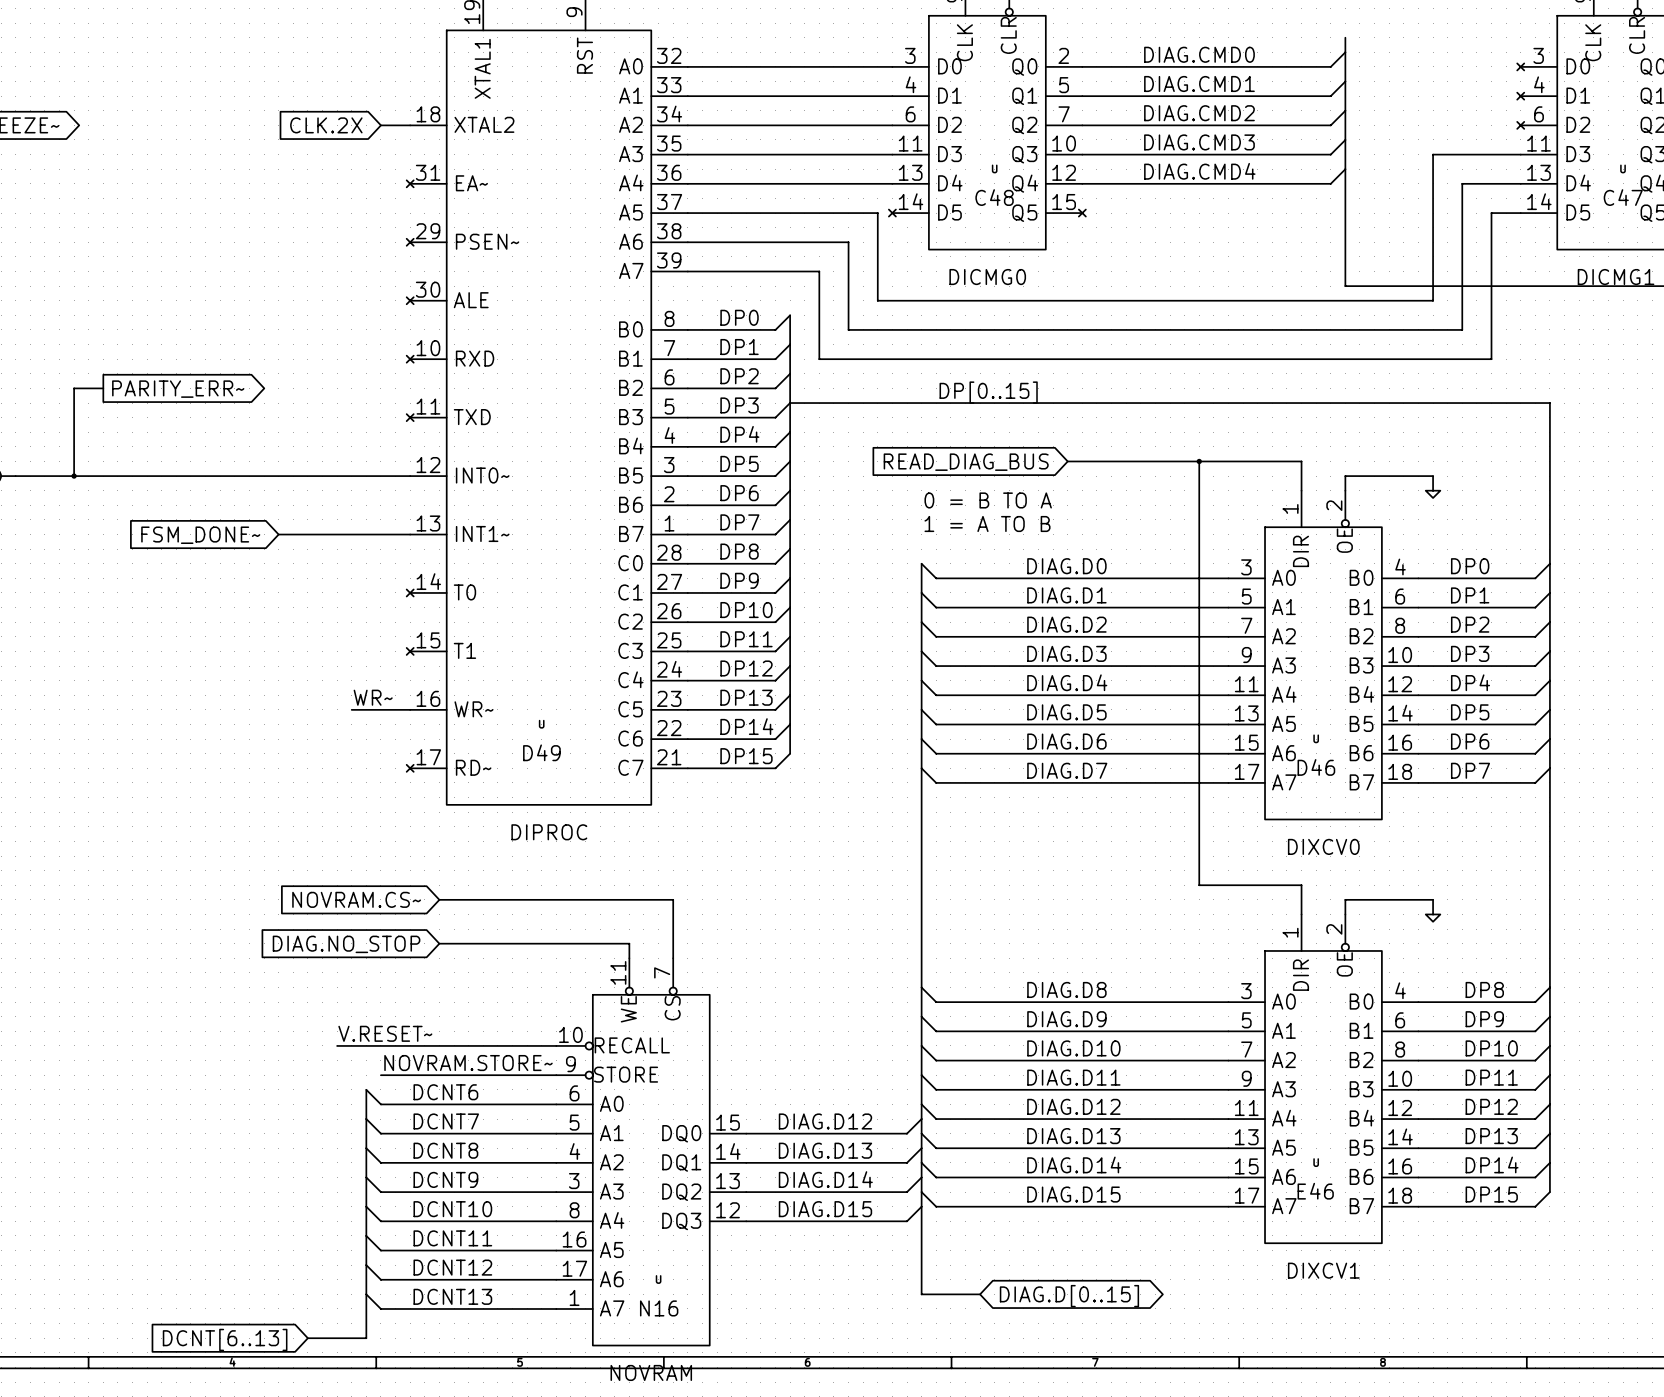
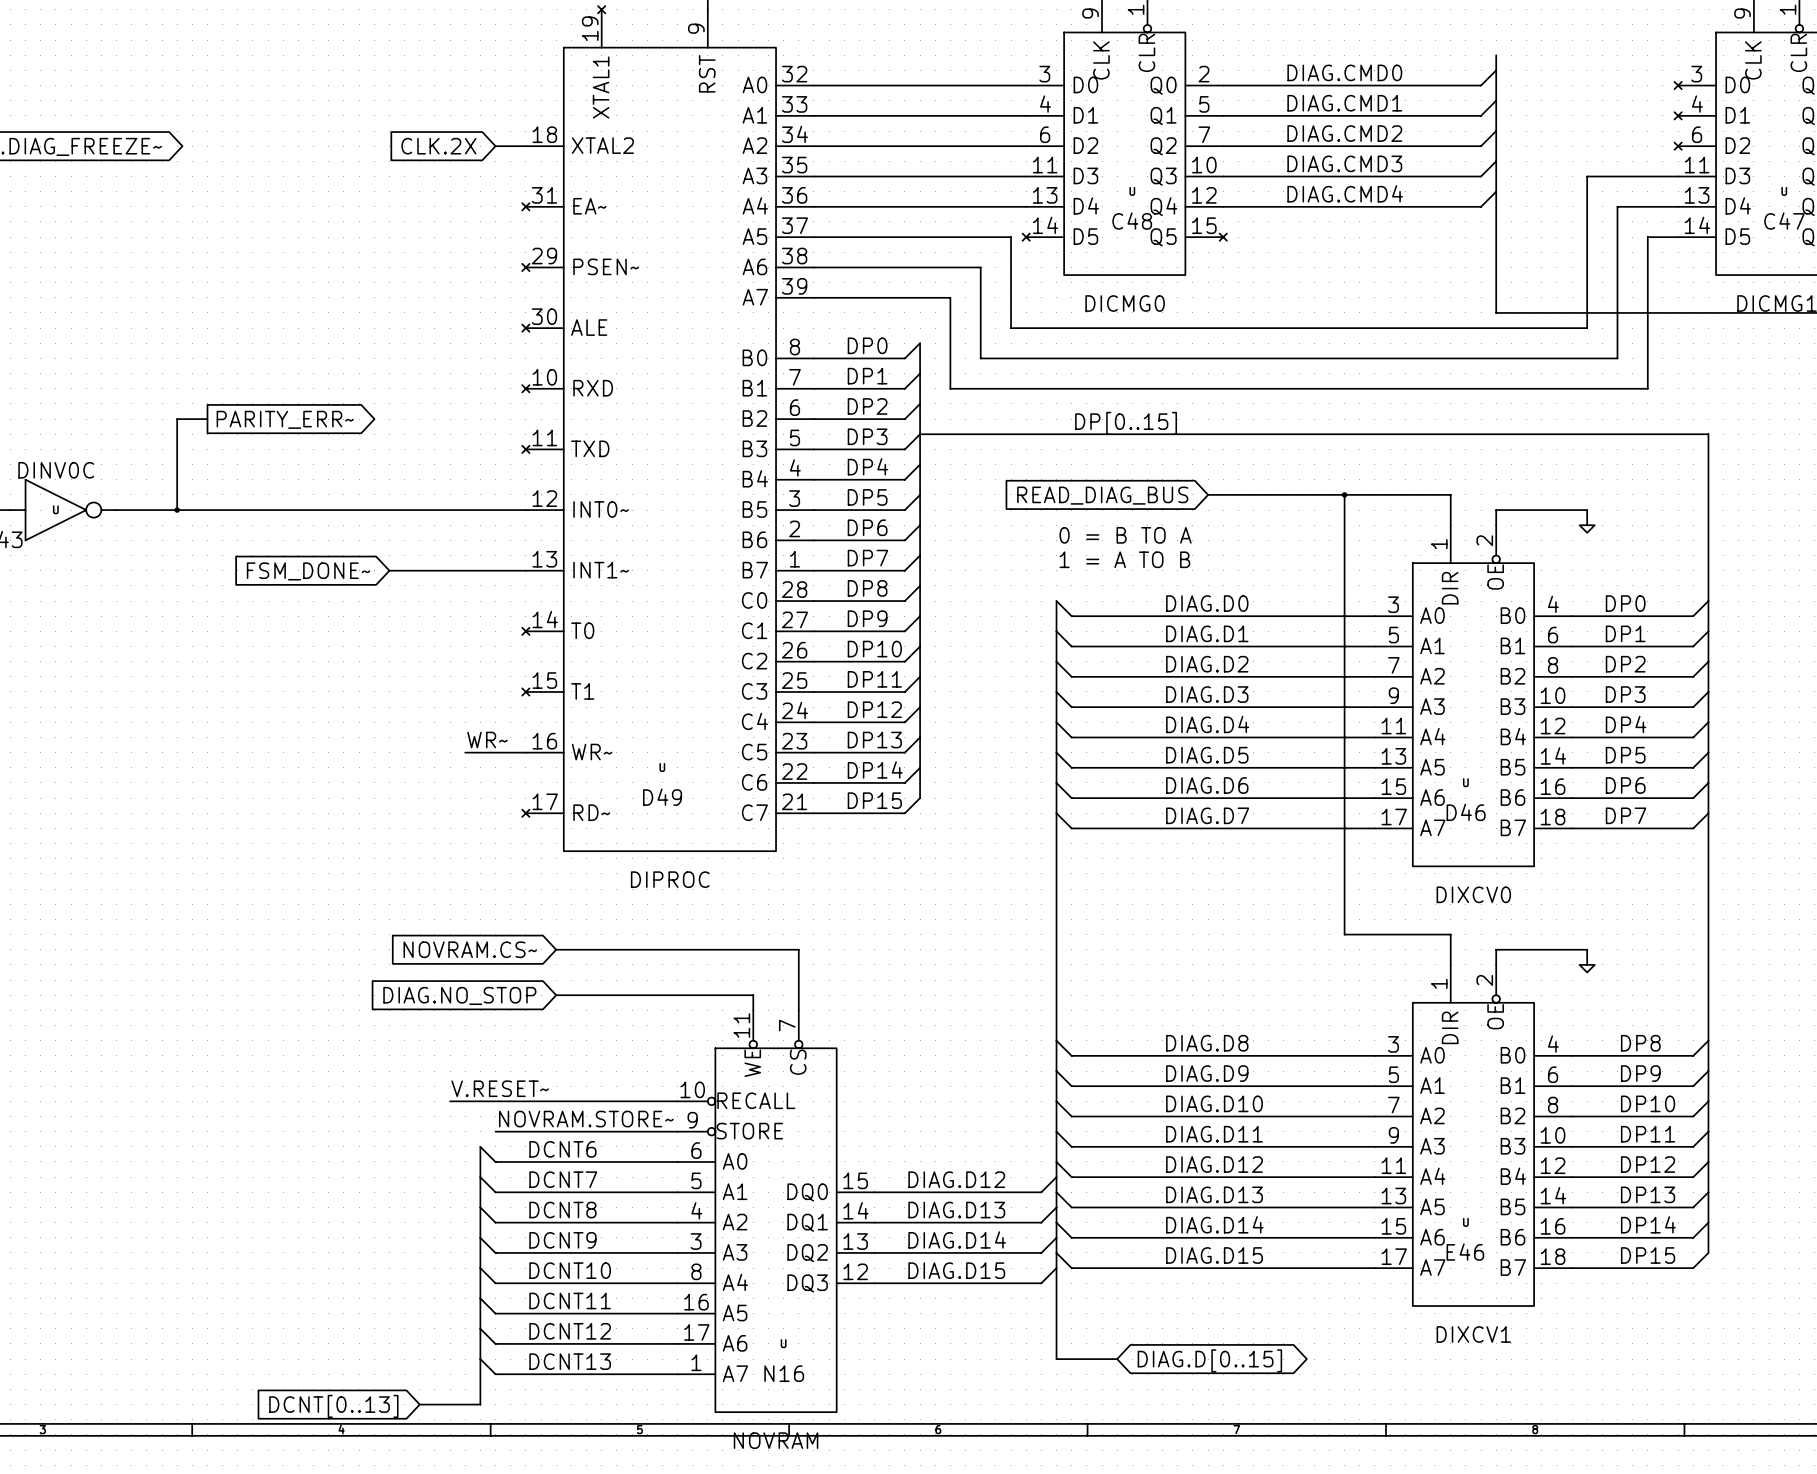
global label: DCNT[6..13] (225, 1339) -> DCNT[0..13] (333, 1406)

